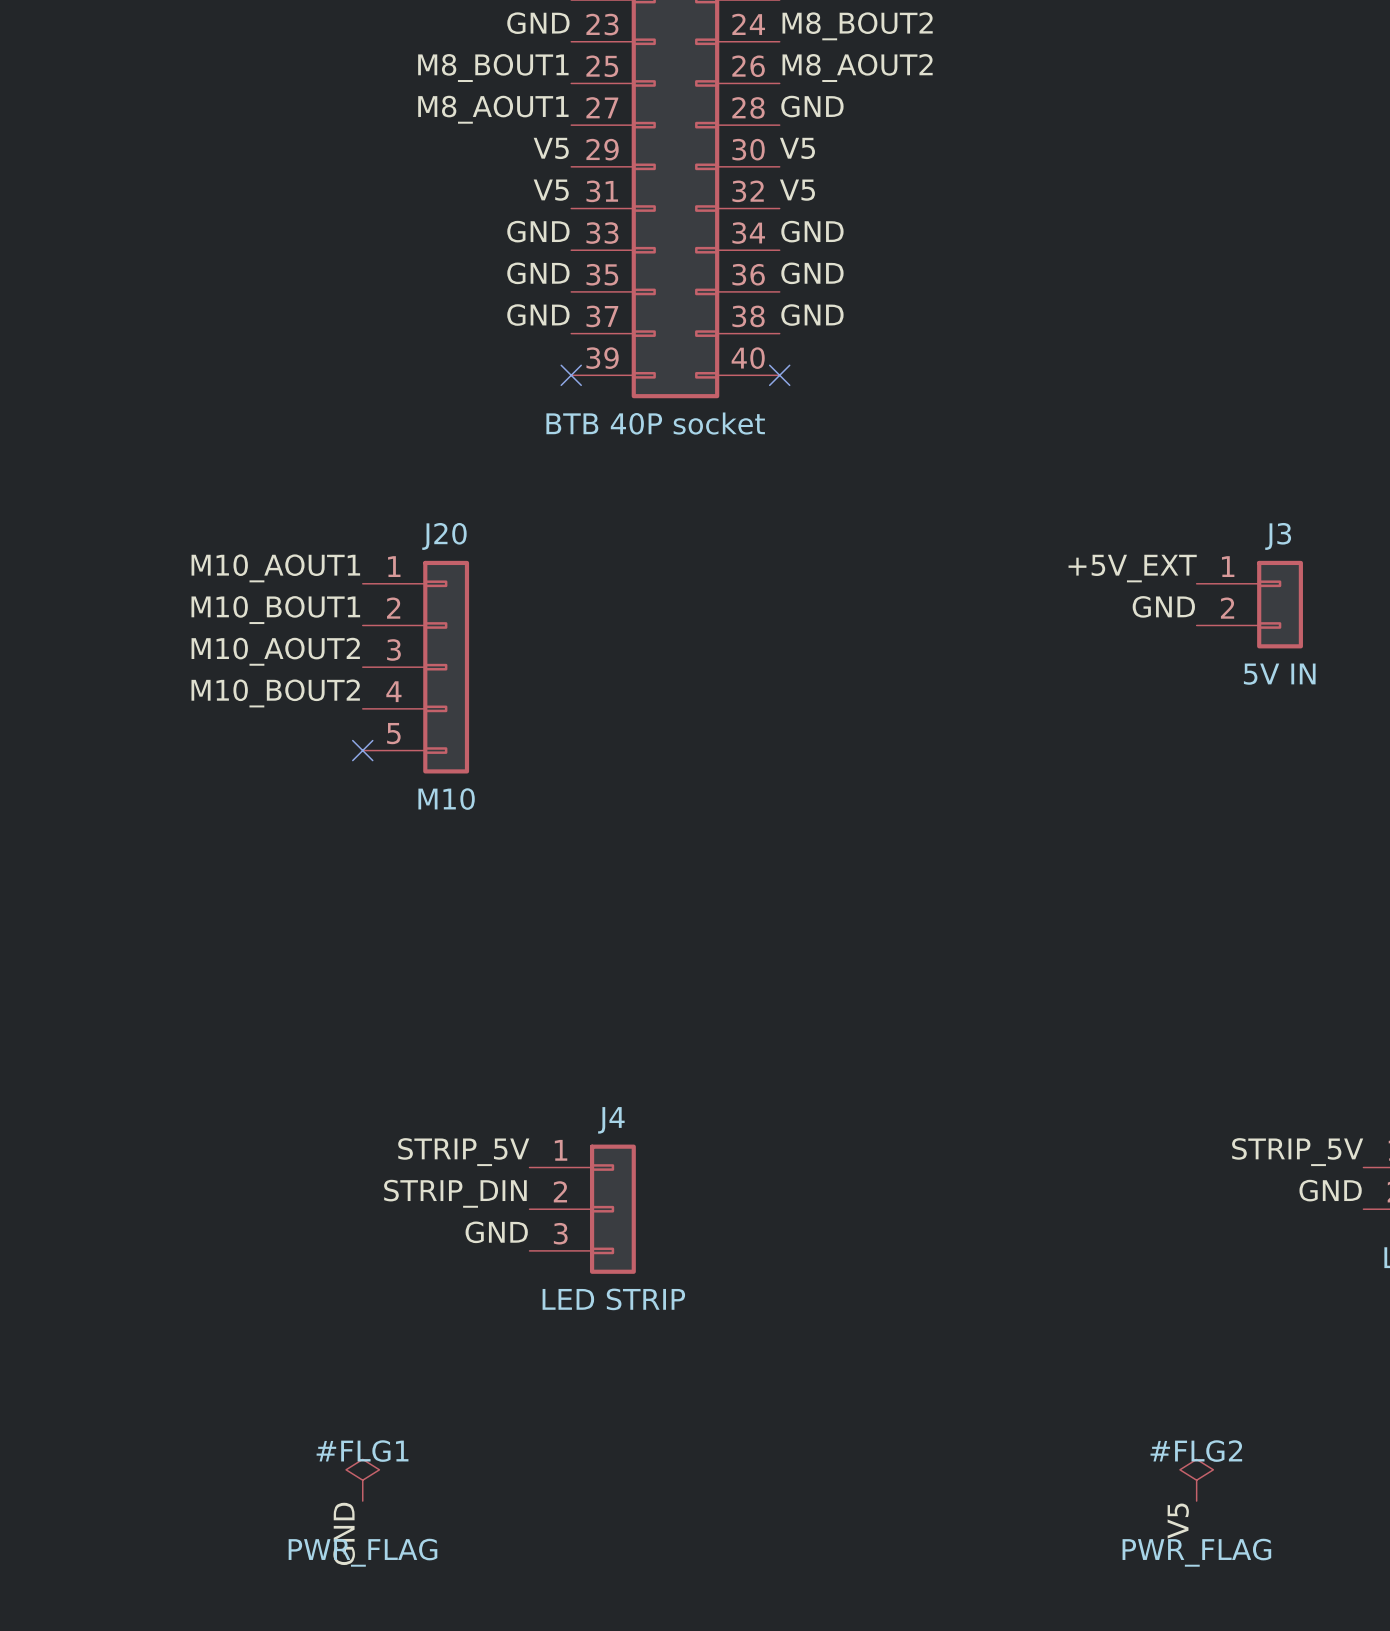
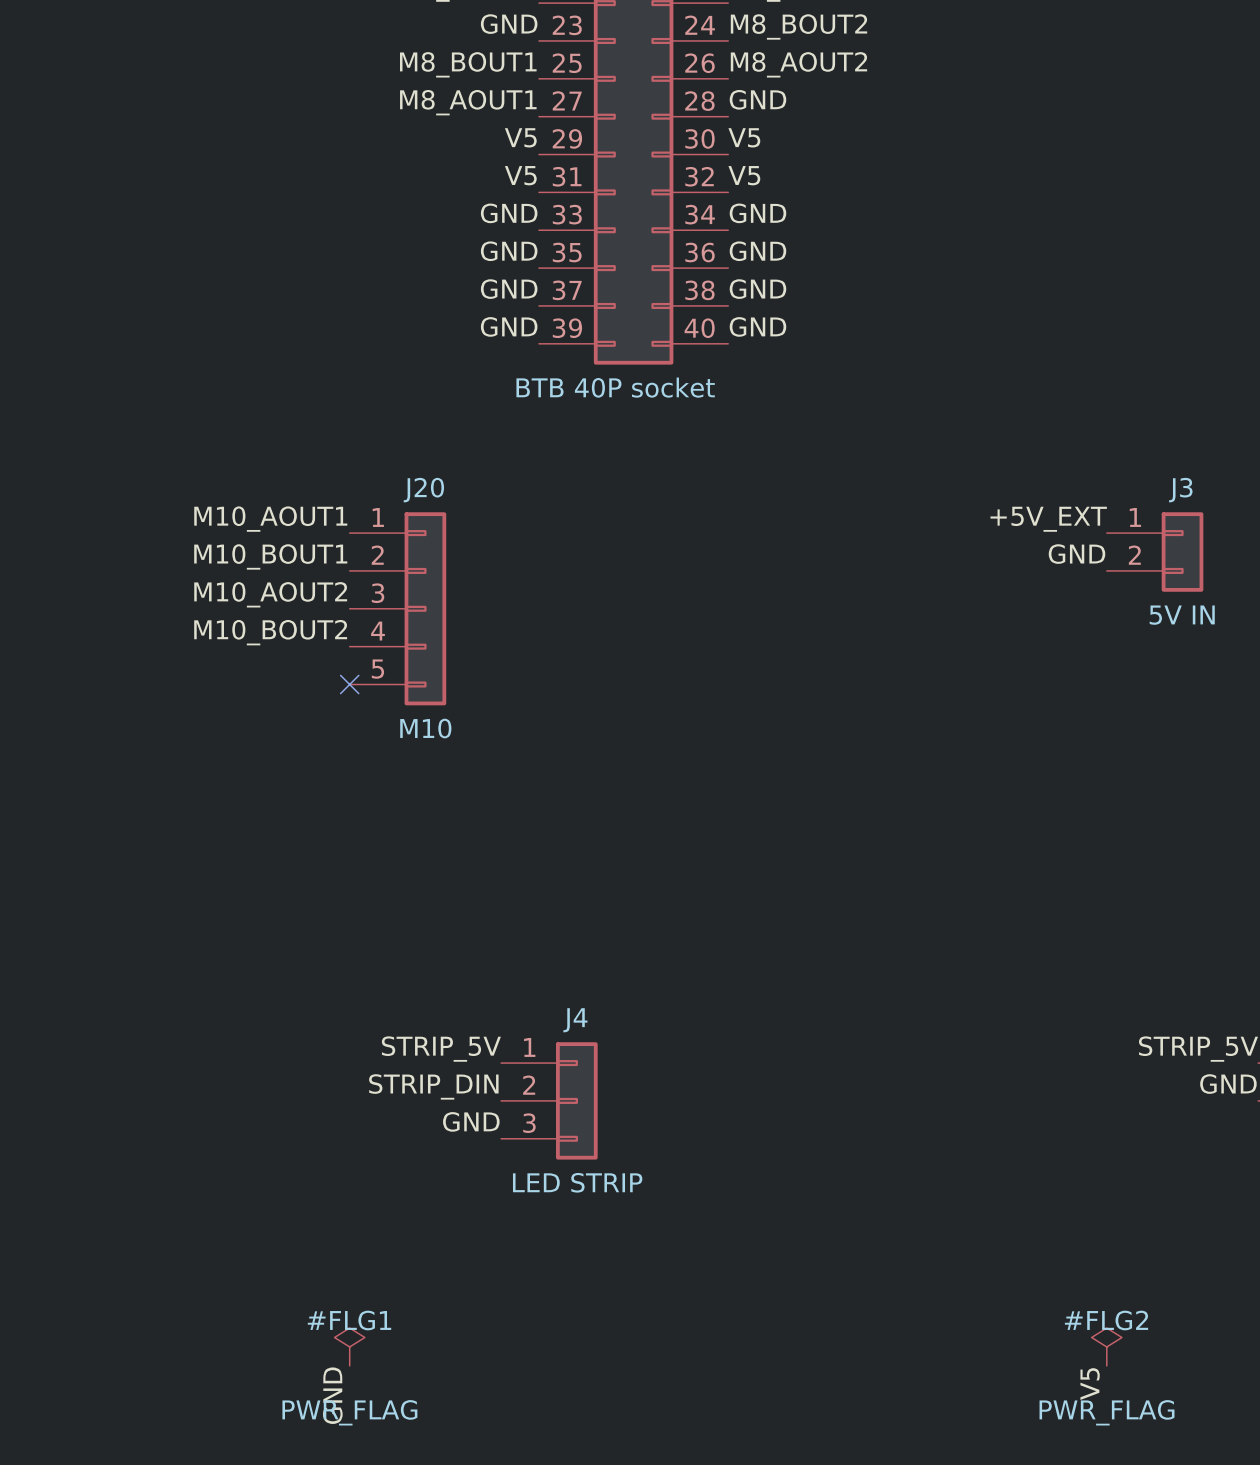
label: none -> GND (509, 326)
label: none -> GND (757, 326)
no-connect mark: (571, 375) -> none
no-connect mark: (779, 375) -> none

